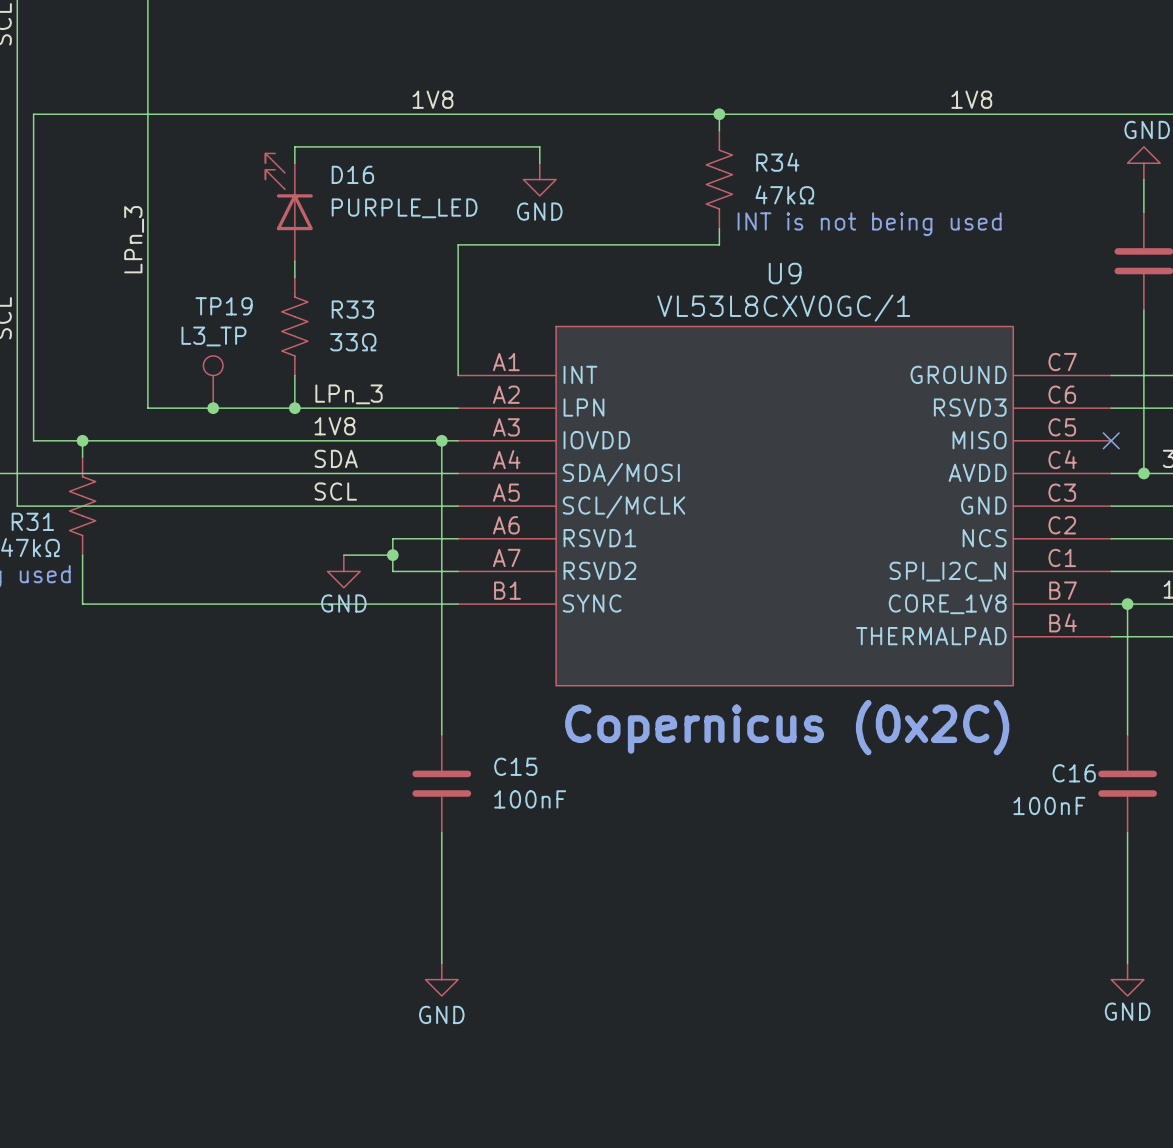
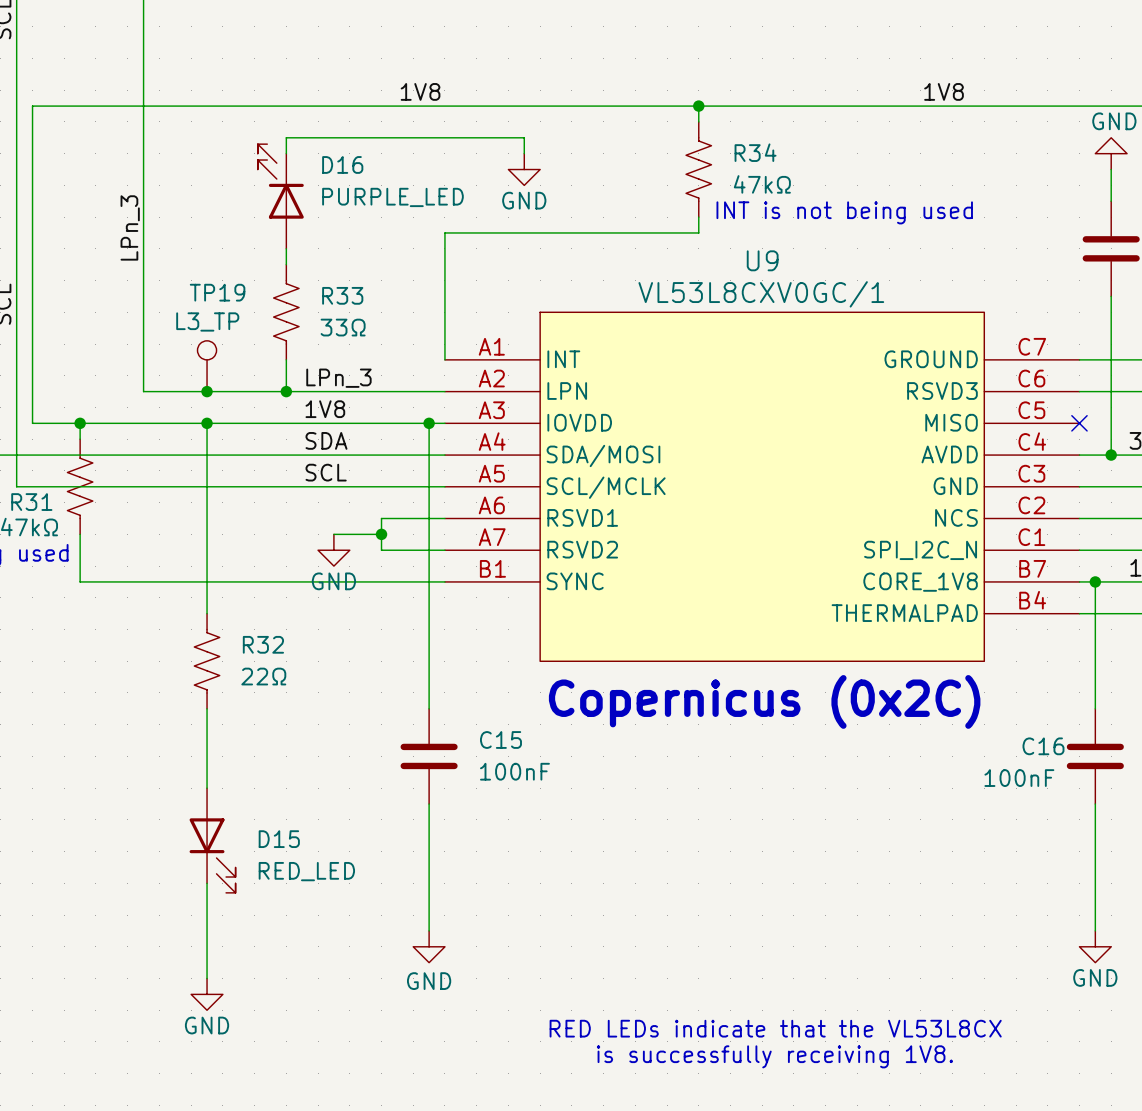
wire: none -> (207, 423) (207, 613)
junction: none -> (207, 423)
R32: none -> 22Ω (207, 661)
wire: none -> (207, 708) (207, 788)
D15: none -> RED_LED (212, 840)
wire: none -> (207, 883) (207, 978)
power symbol: none -> GND (207, 994)
text: none -> RED LEDs indicate that the VL53L8CX (775, 1028)
text: none -> is successfully receiving 1V8. (774, 1056)

